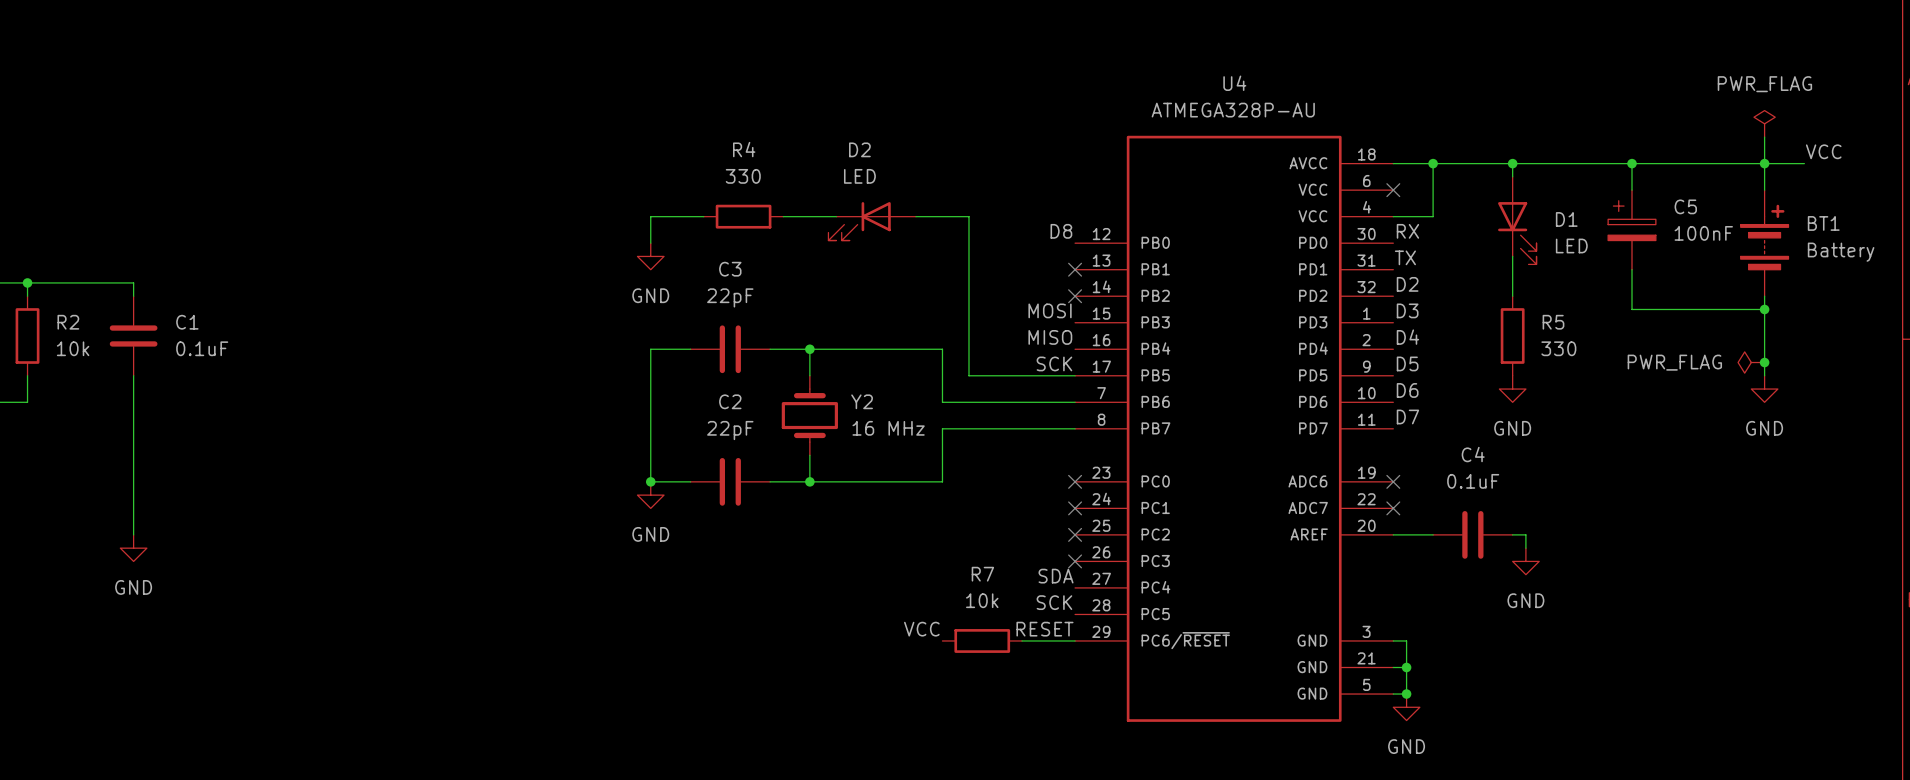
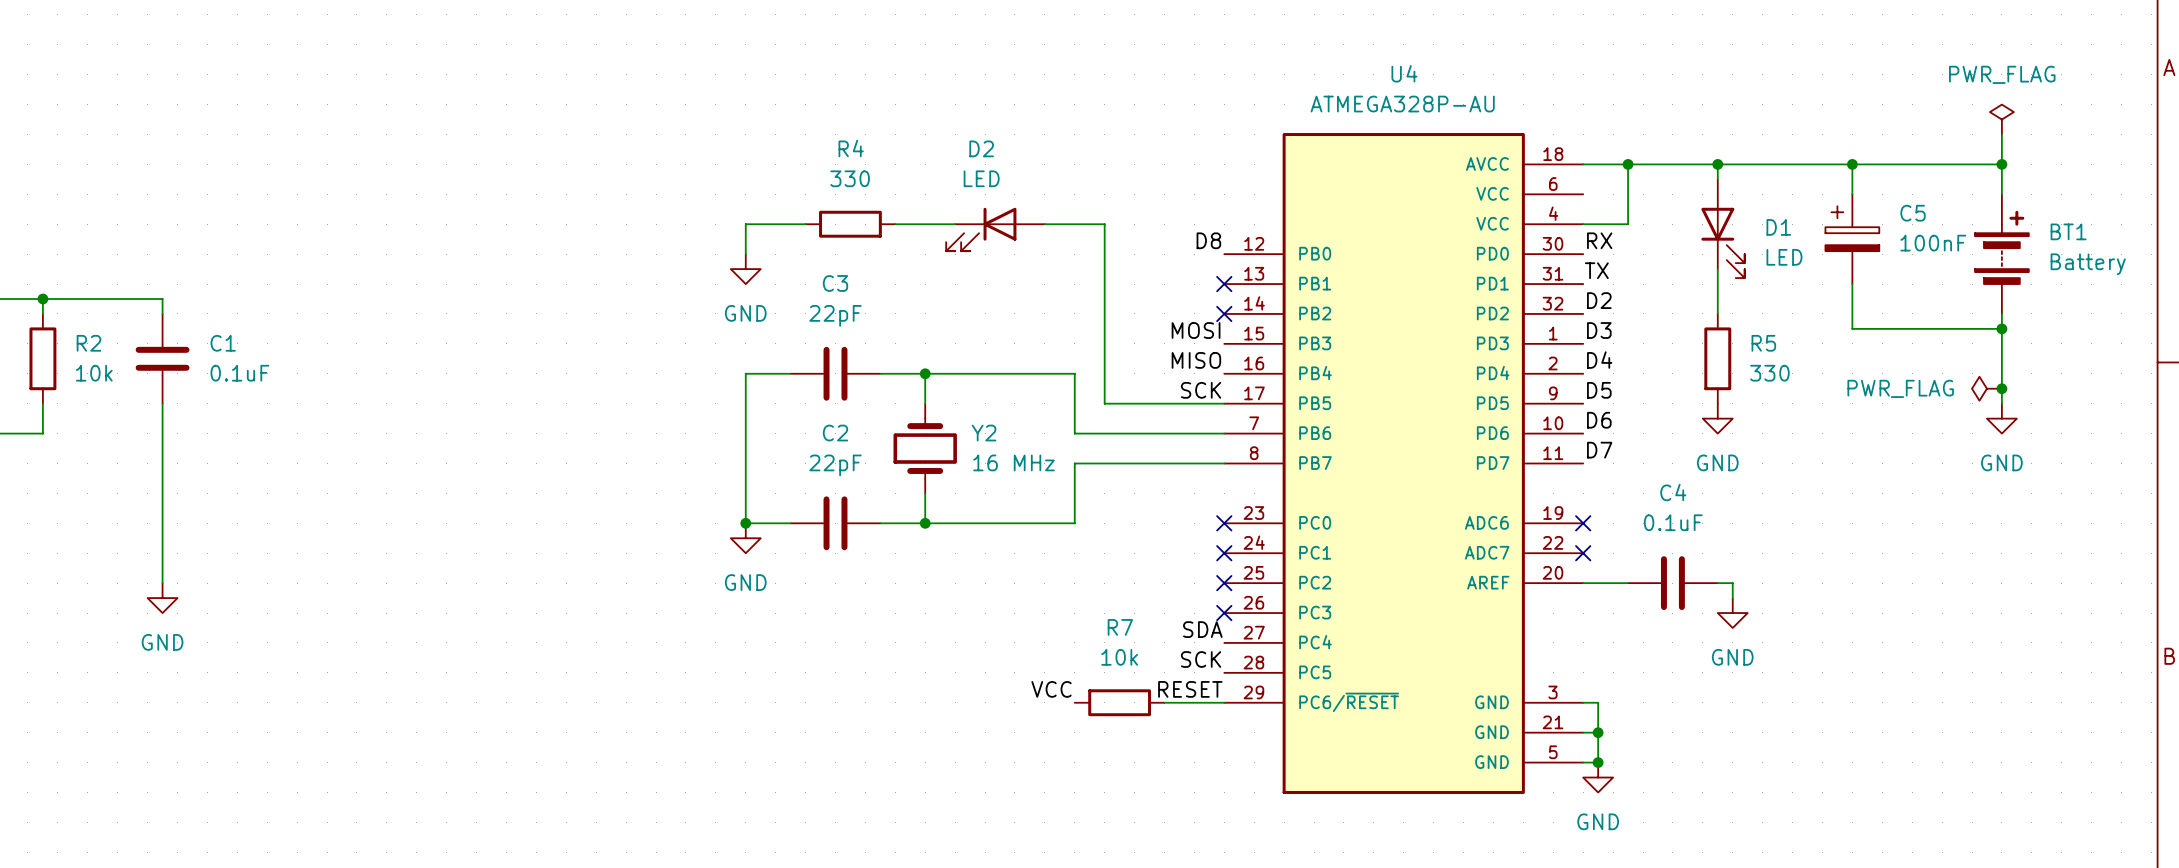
label: VCC (1823, 151) -> none
wire: (1764, 163) (1804, 163) -> none
no-connect mark: (1393, 190) -> none

